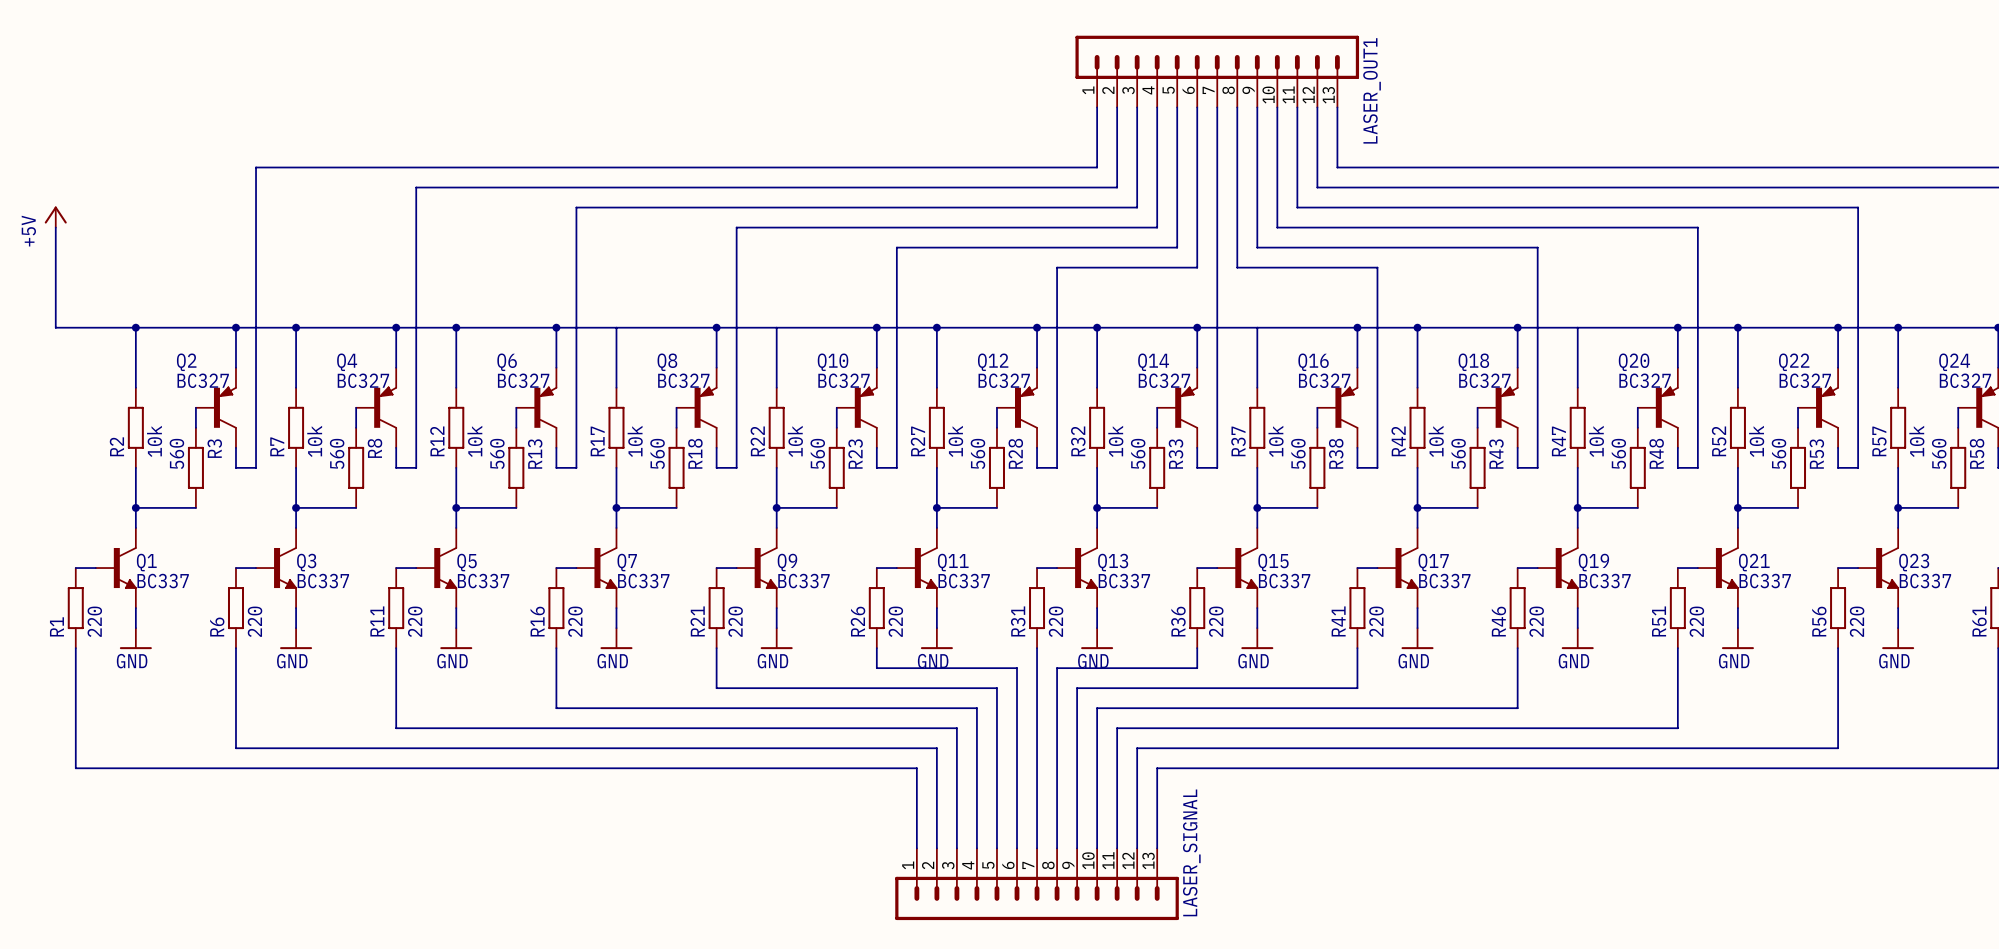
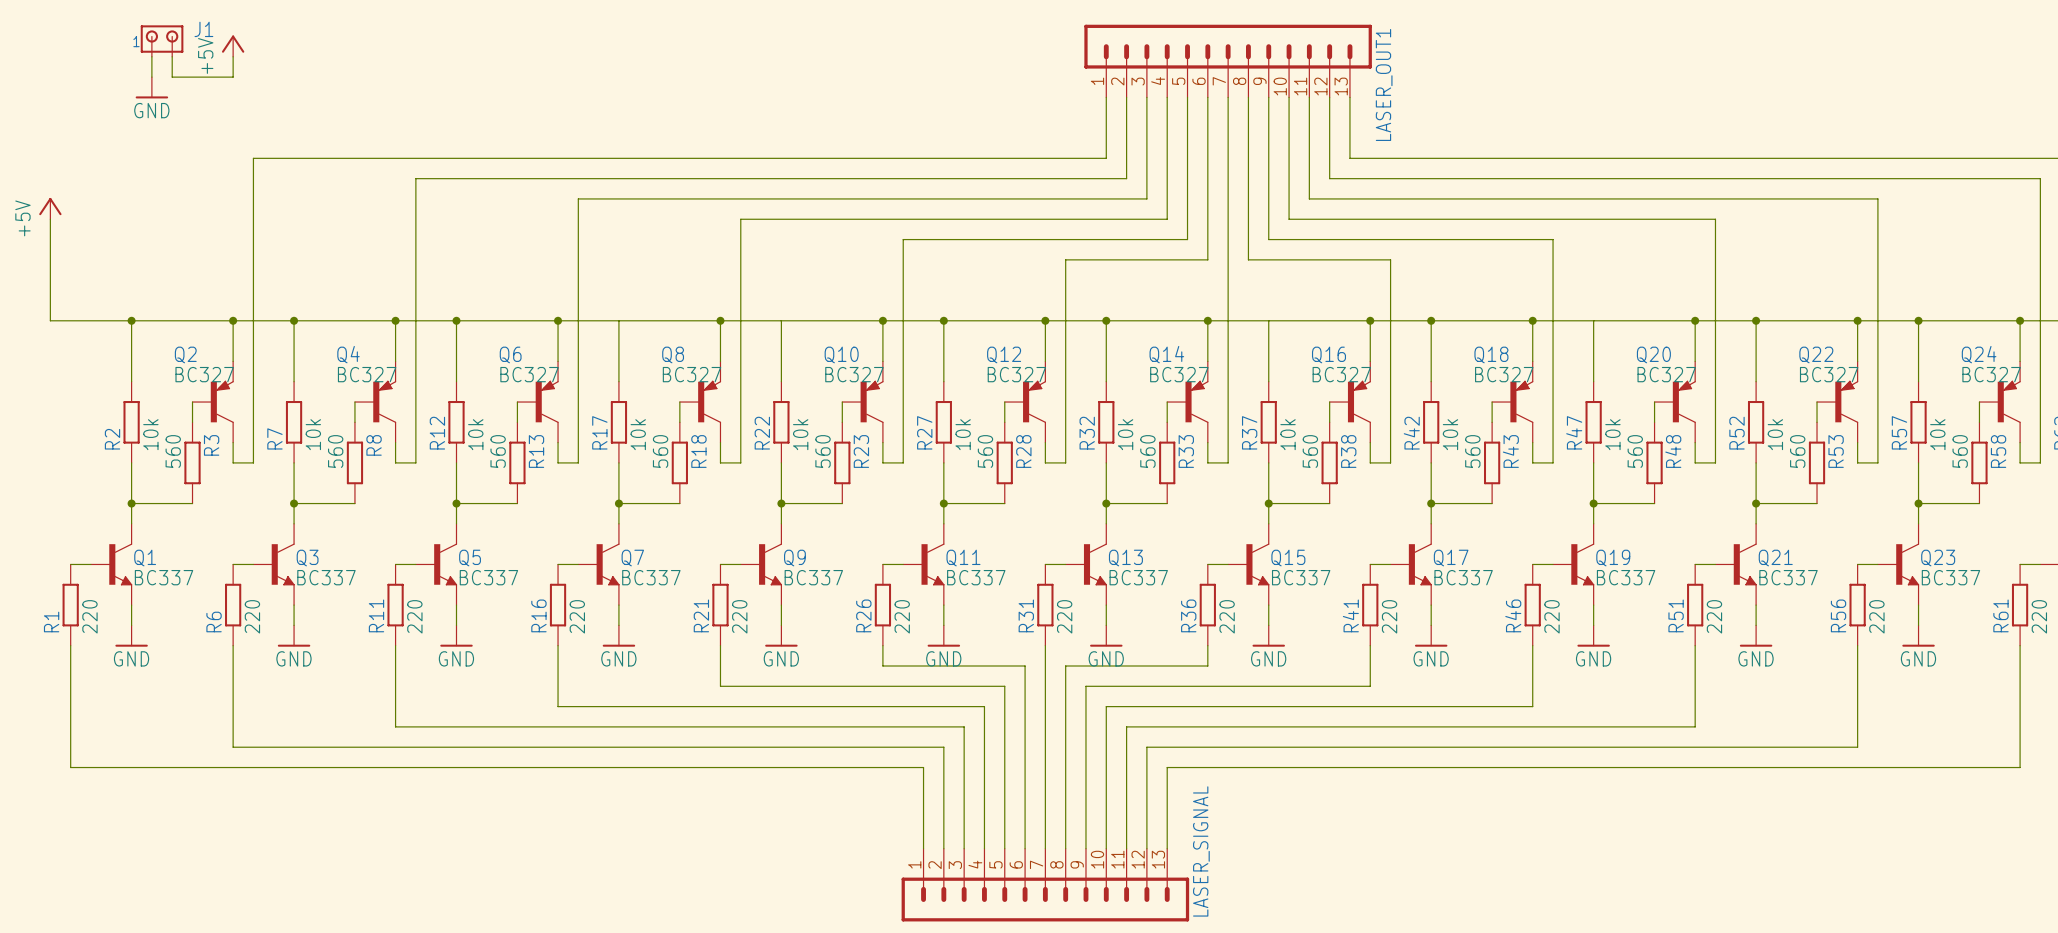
J1: none -> (162, 41)
power symbol: none -> +5V (233, 46)
wire: none -> (151, 56) (151, 77)
wire: none -> (172, 56) (172, 77) (233, 77) (233, 56)
power symbol: none -> GND (151, 87)

